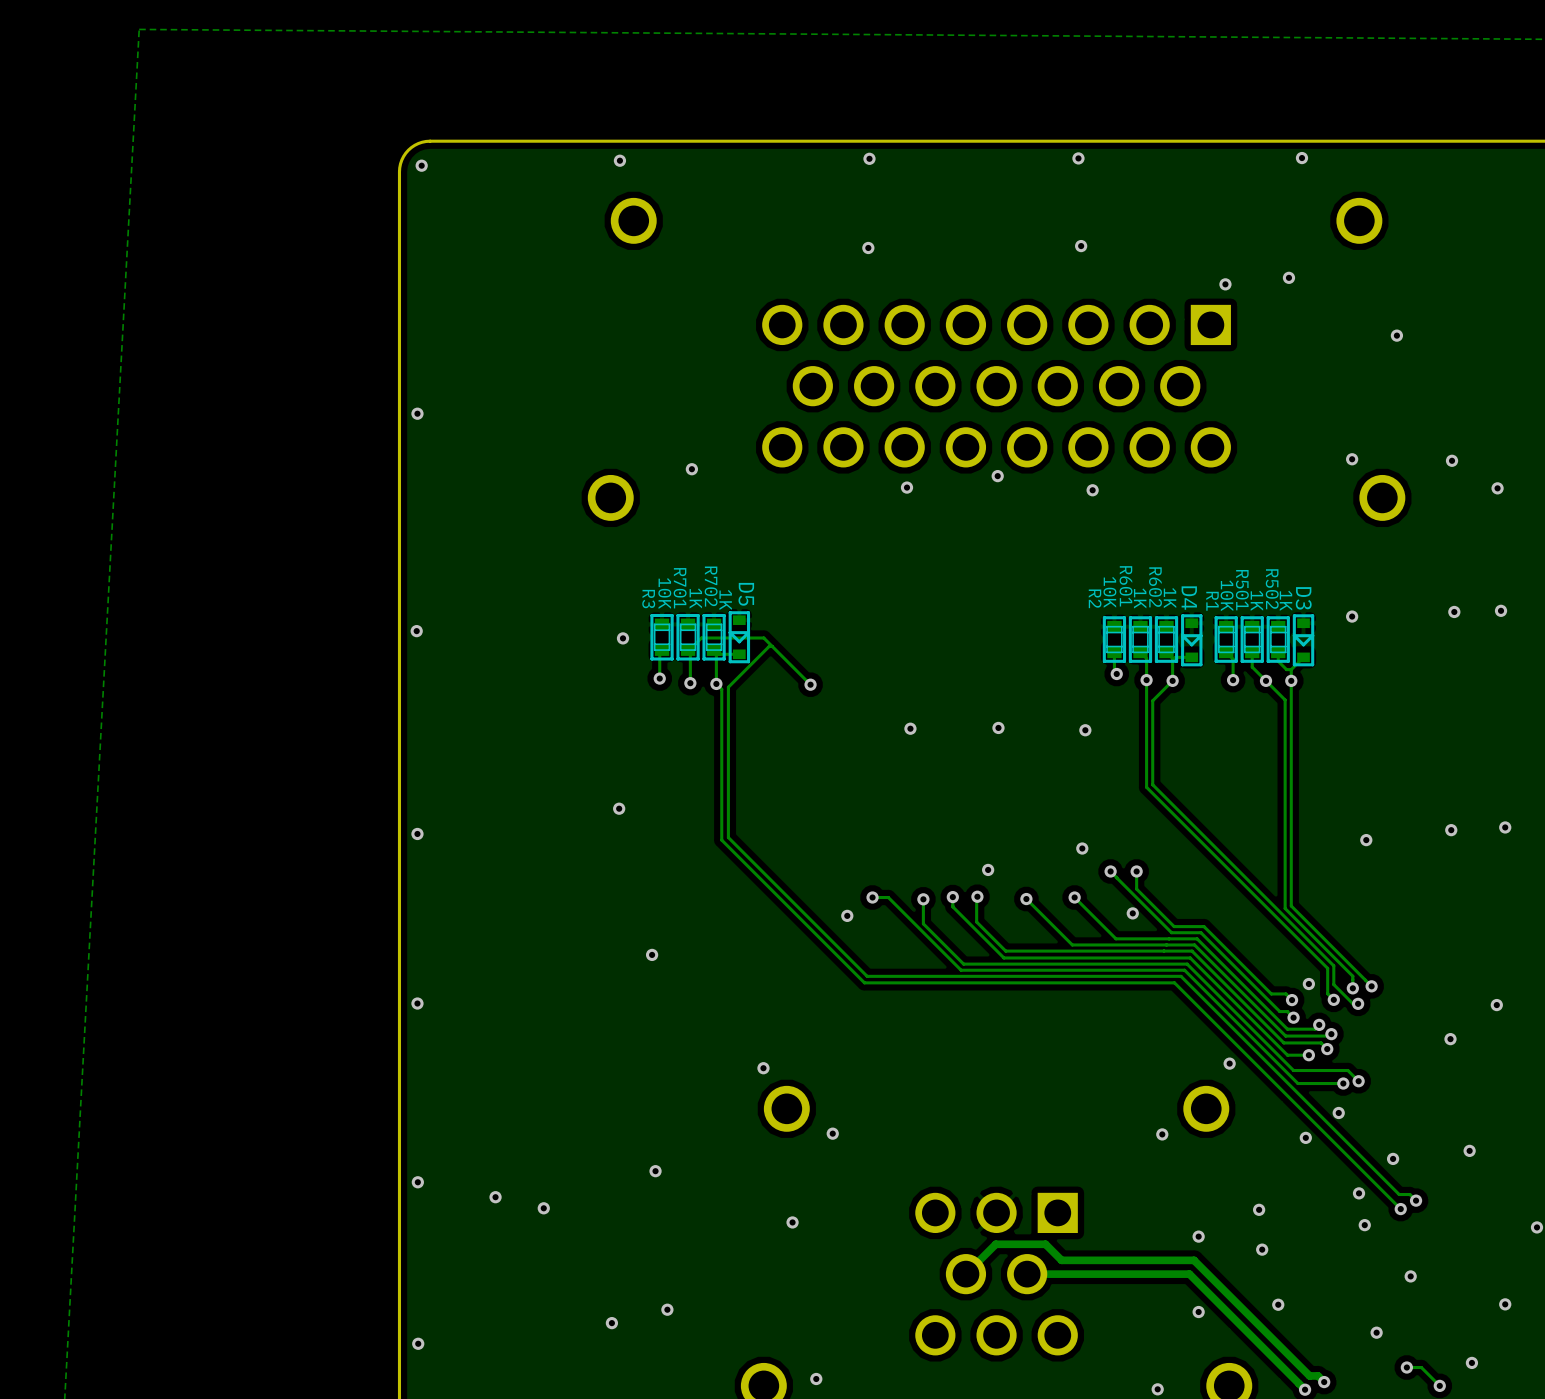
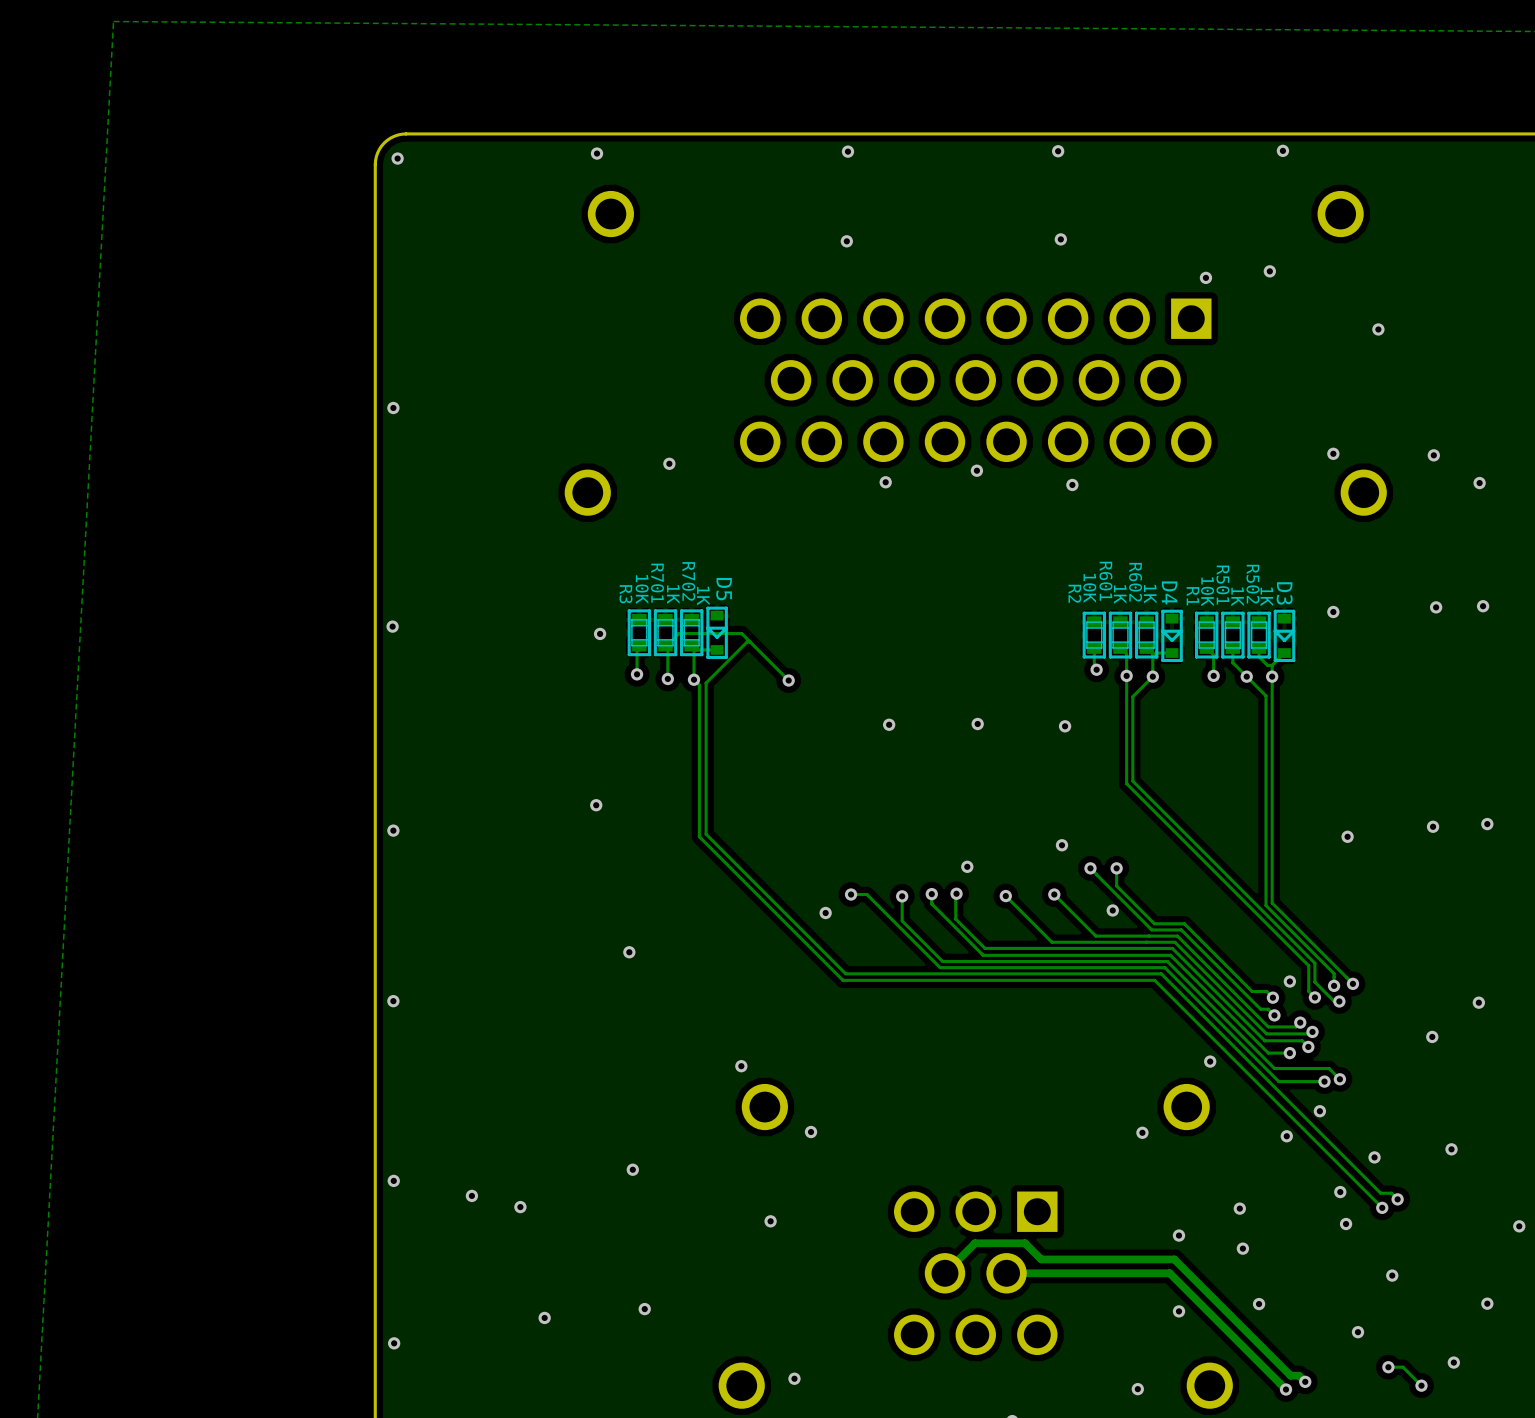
via position: (611, 1323) -> (544, 1317)

